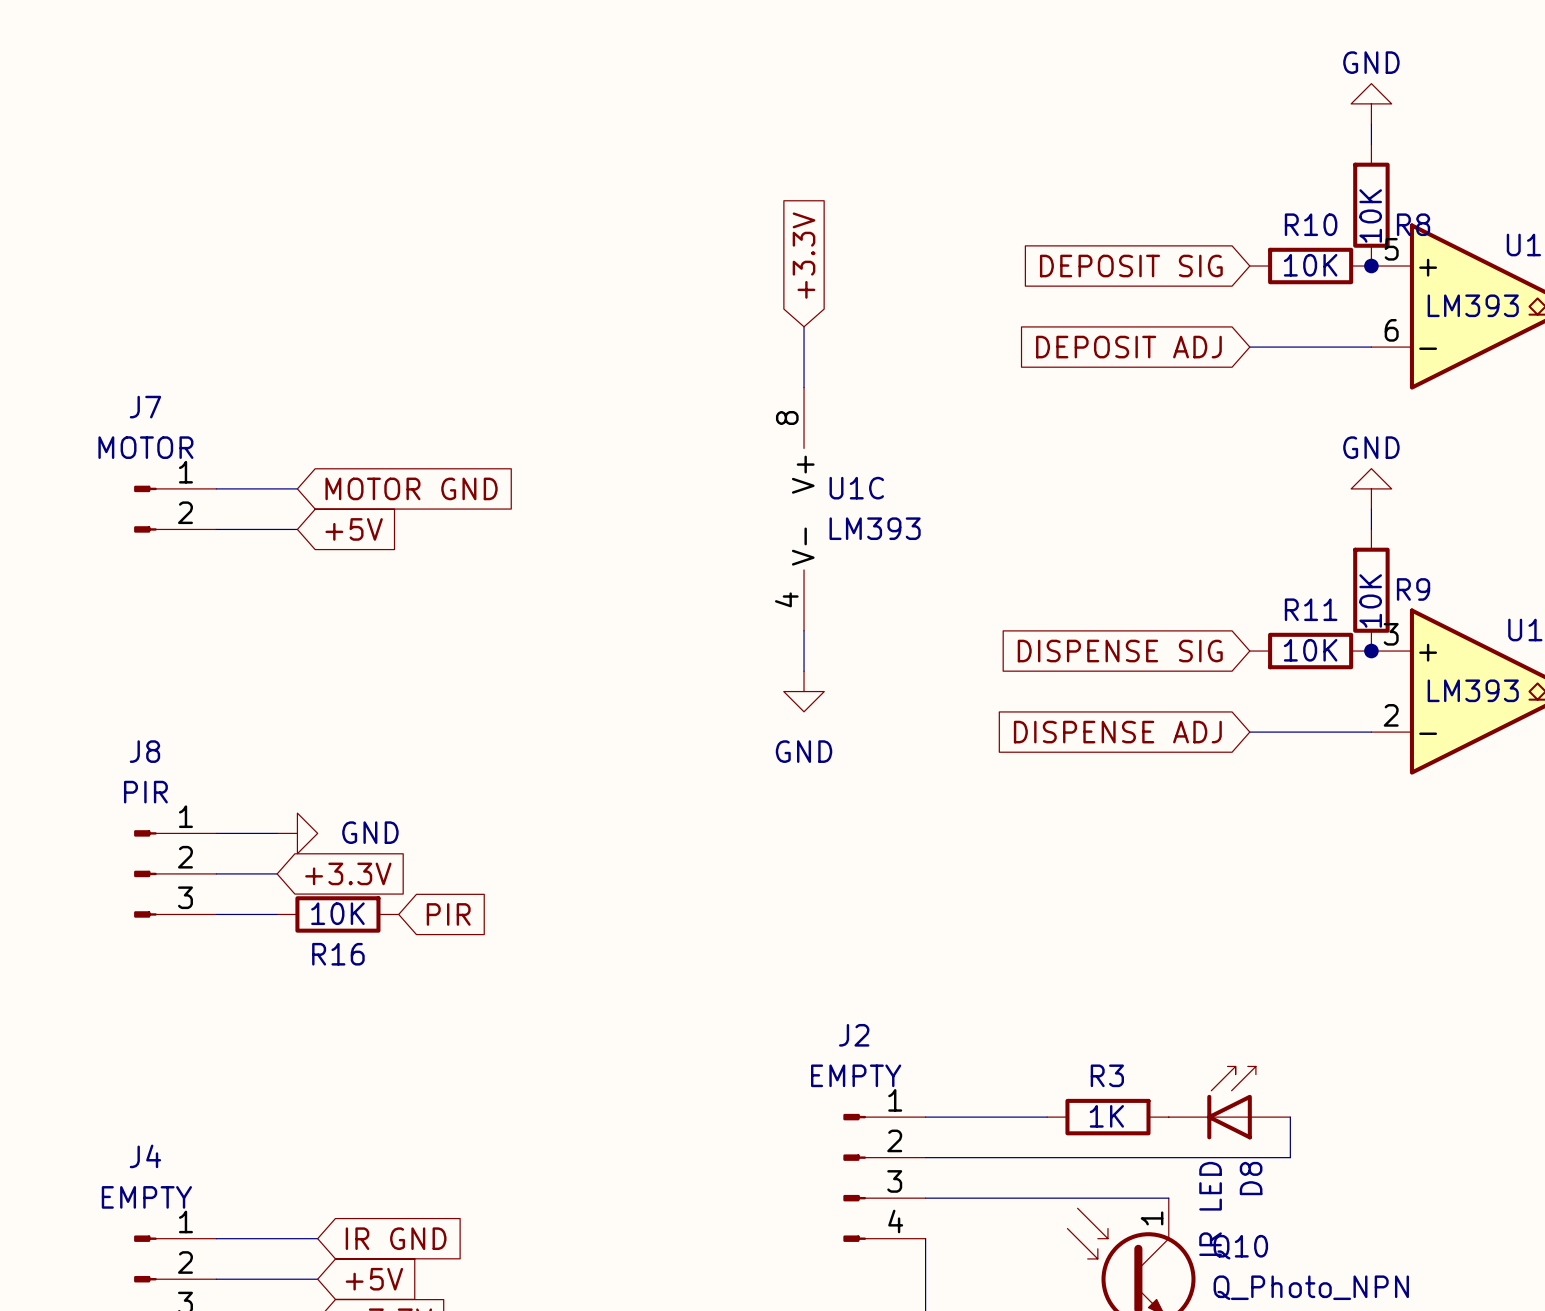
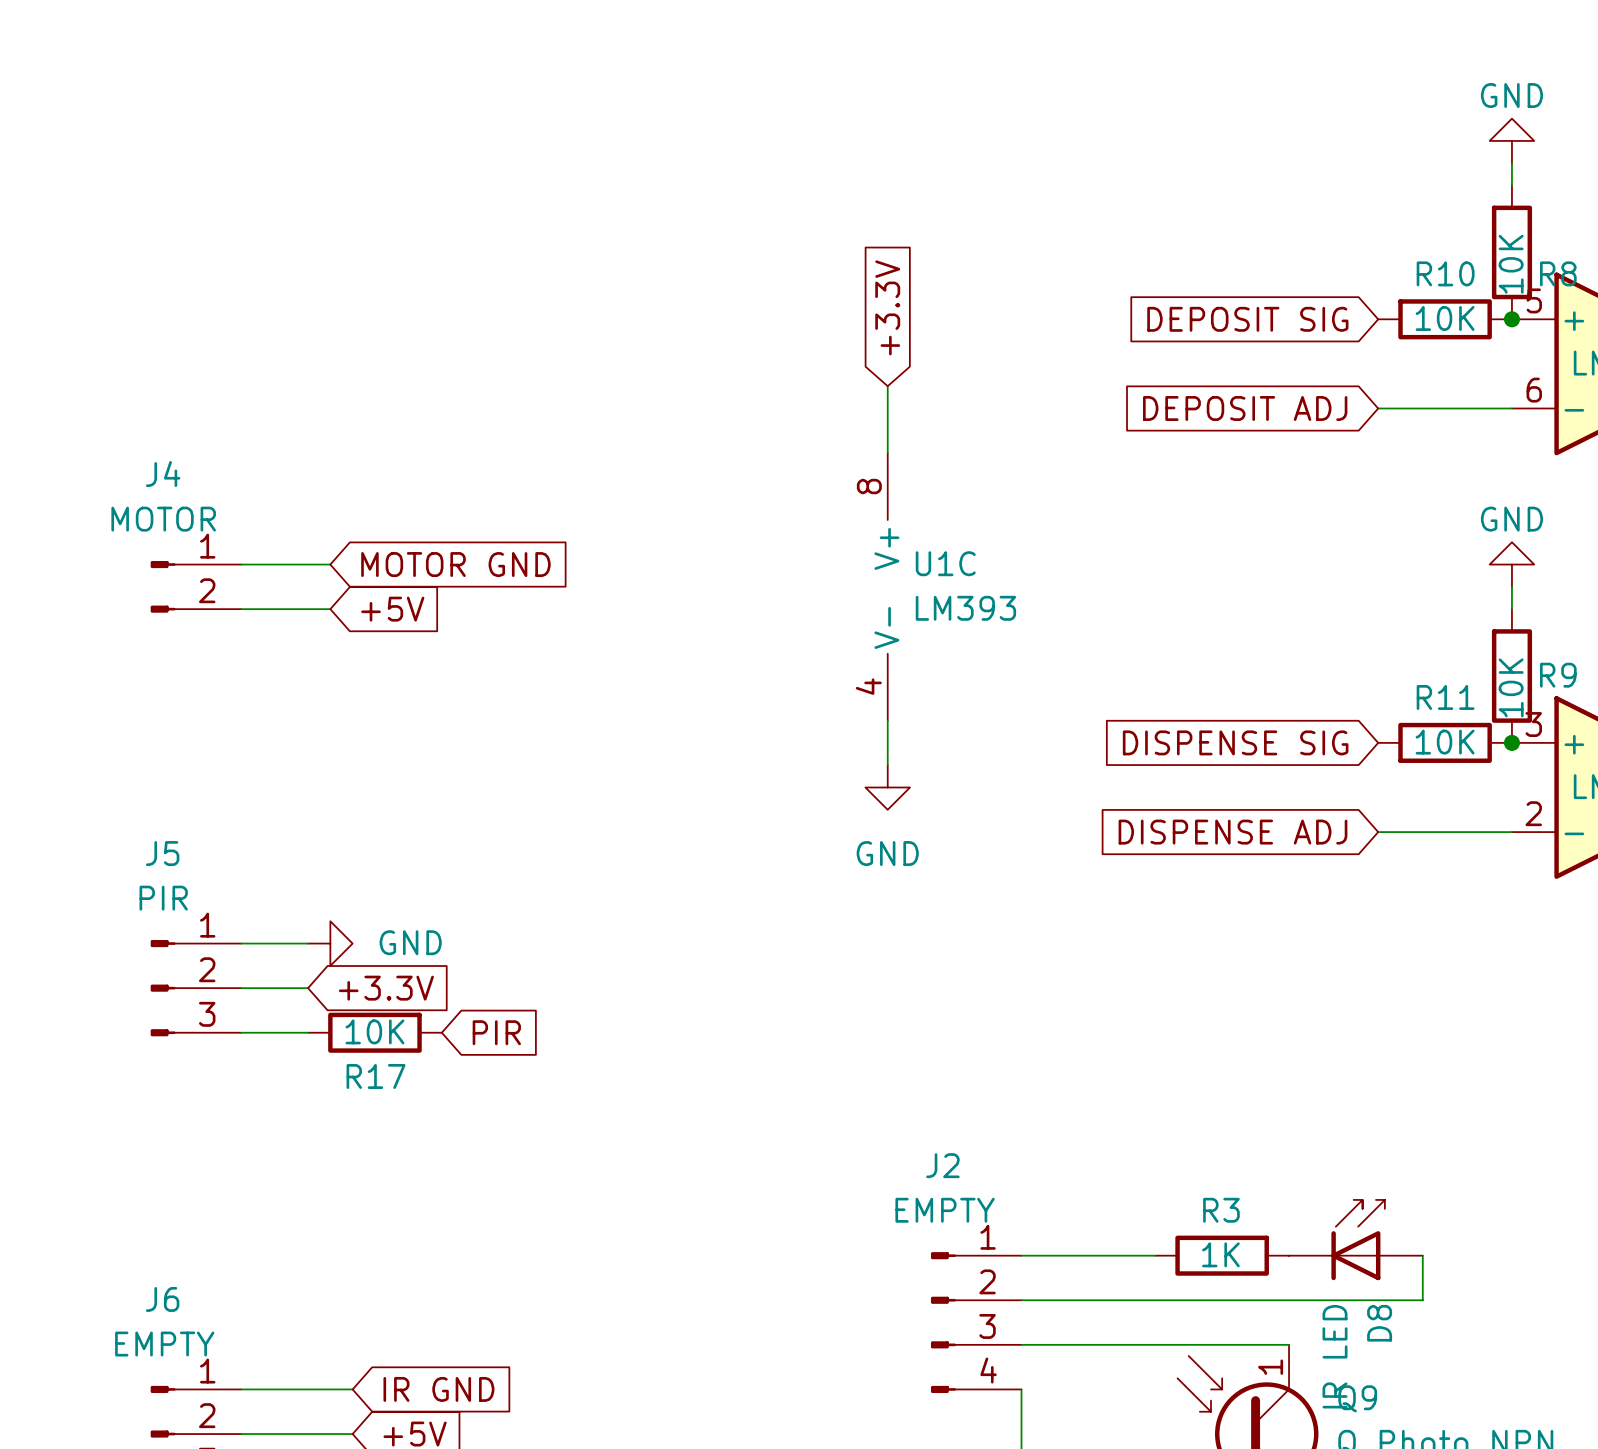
J7 name: J7 (145, 407) -> J4 (163, 474)
J8 name: J8 (144, 751) -> J5 (162, 853)
R16 name: R16 (338, 954) -> R17 (376, 1076)
J4 name: J4 (145, 1156) -> J6 (162, 1299)
Q10 name: Q10 (1240, 1247) -> Q9 (1357, 1398)

